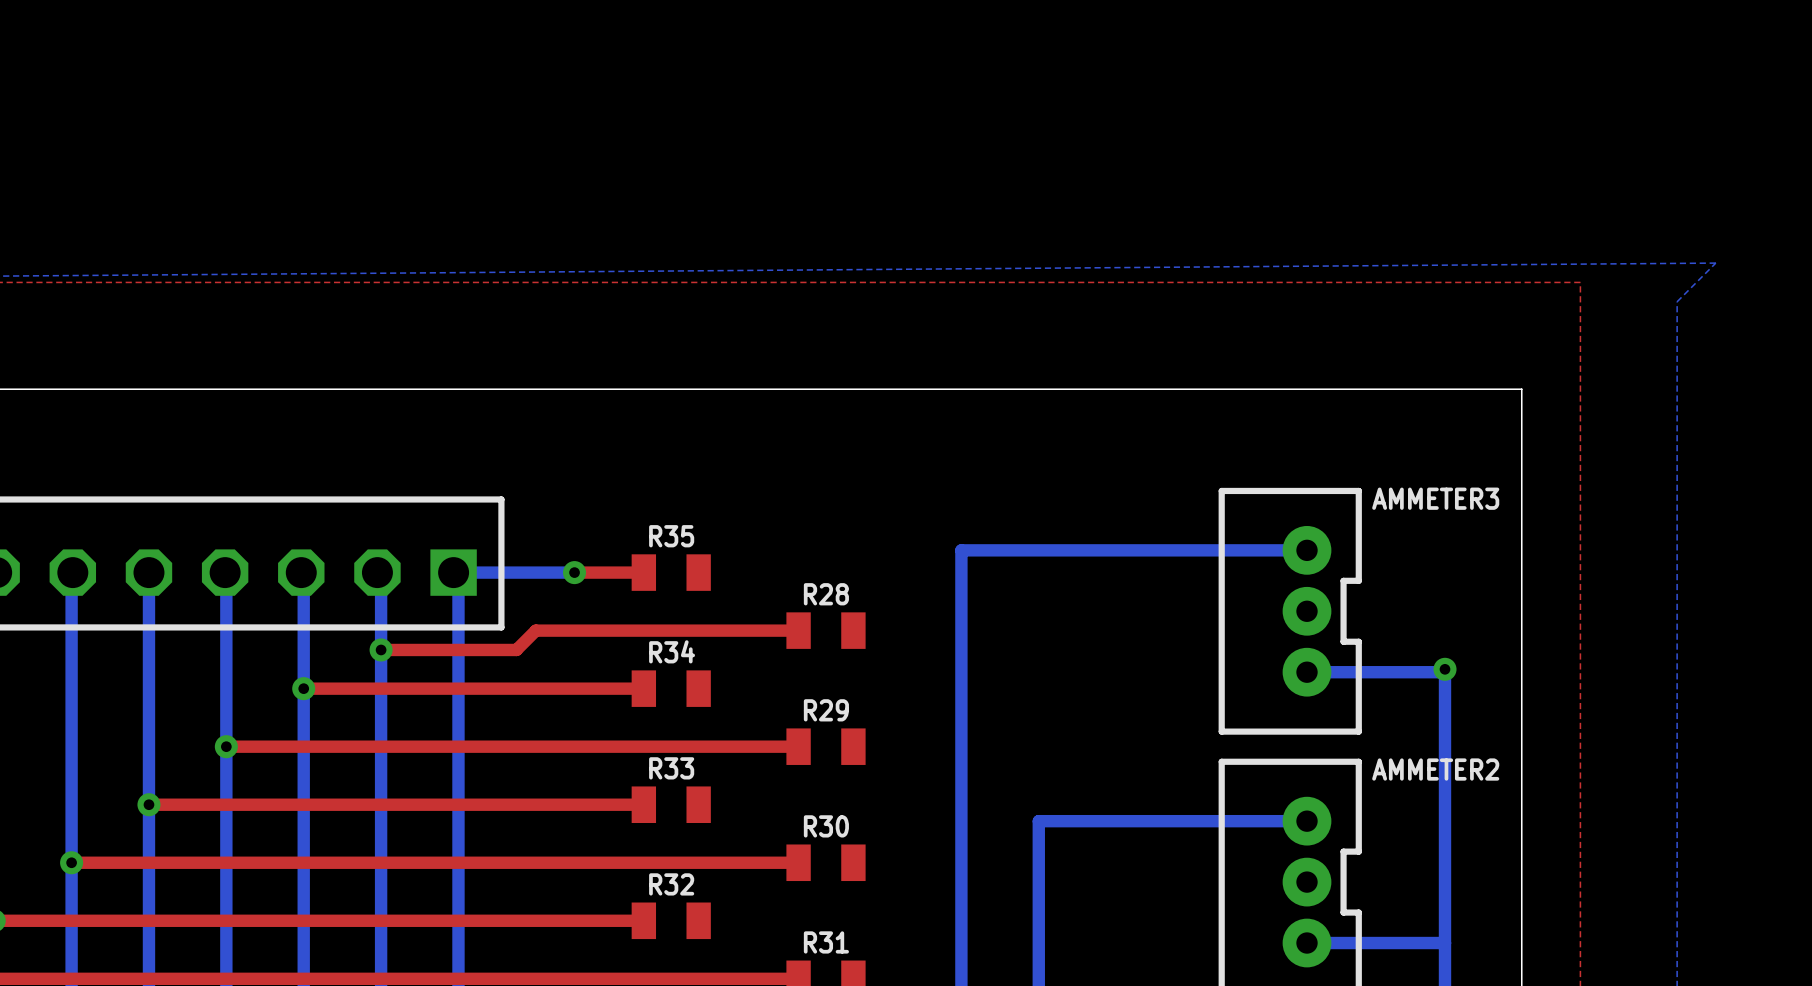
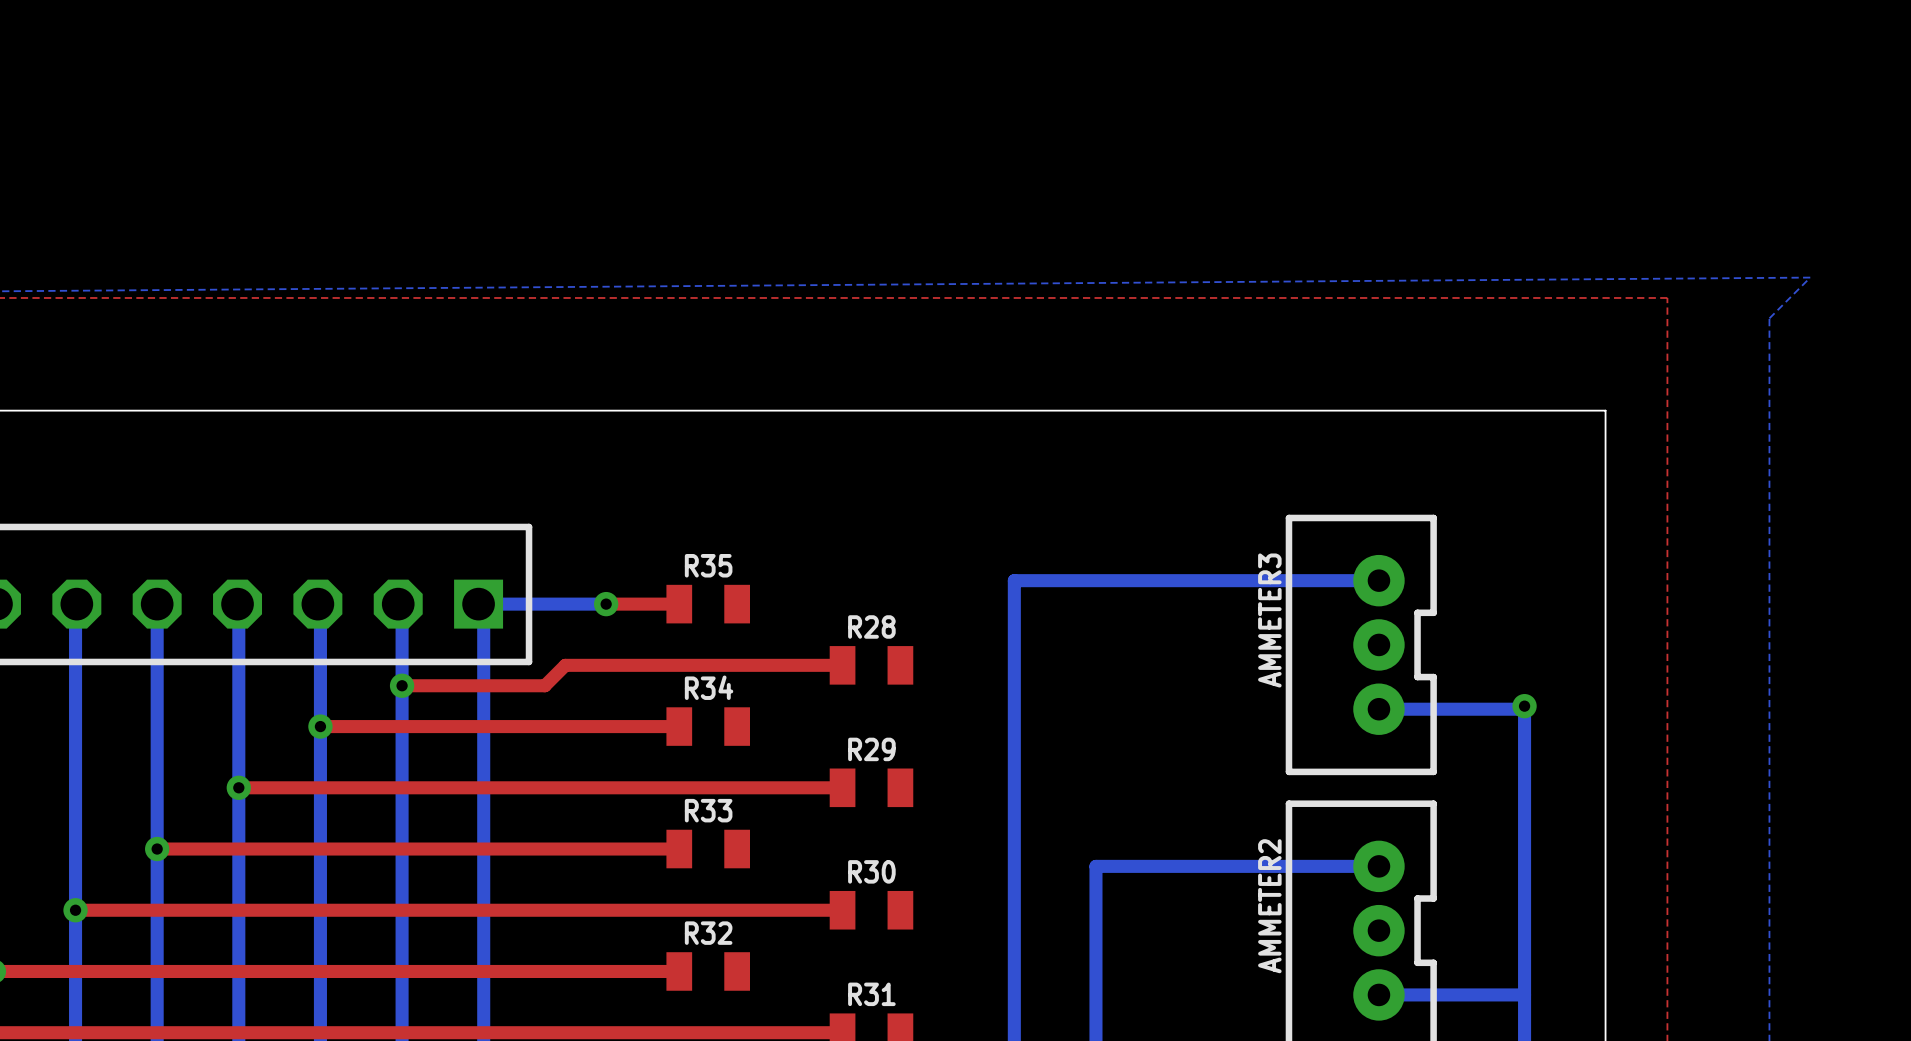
AMMETER3 name rotation: 0° (1435, 498) -> 90° counterclockwise (1269, 620)
AMMETER3 name position: AMMETER3 (1435, 498) -> AMMETER3 (1269, 620)
AMMETER2 name rotation: 0° (1435, 769) -> 90° counterclockwise (1269, 906)
AMMETER2 name position: AMMETER2 (1435, 769) -> AMMETER2 (1269, 906)

